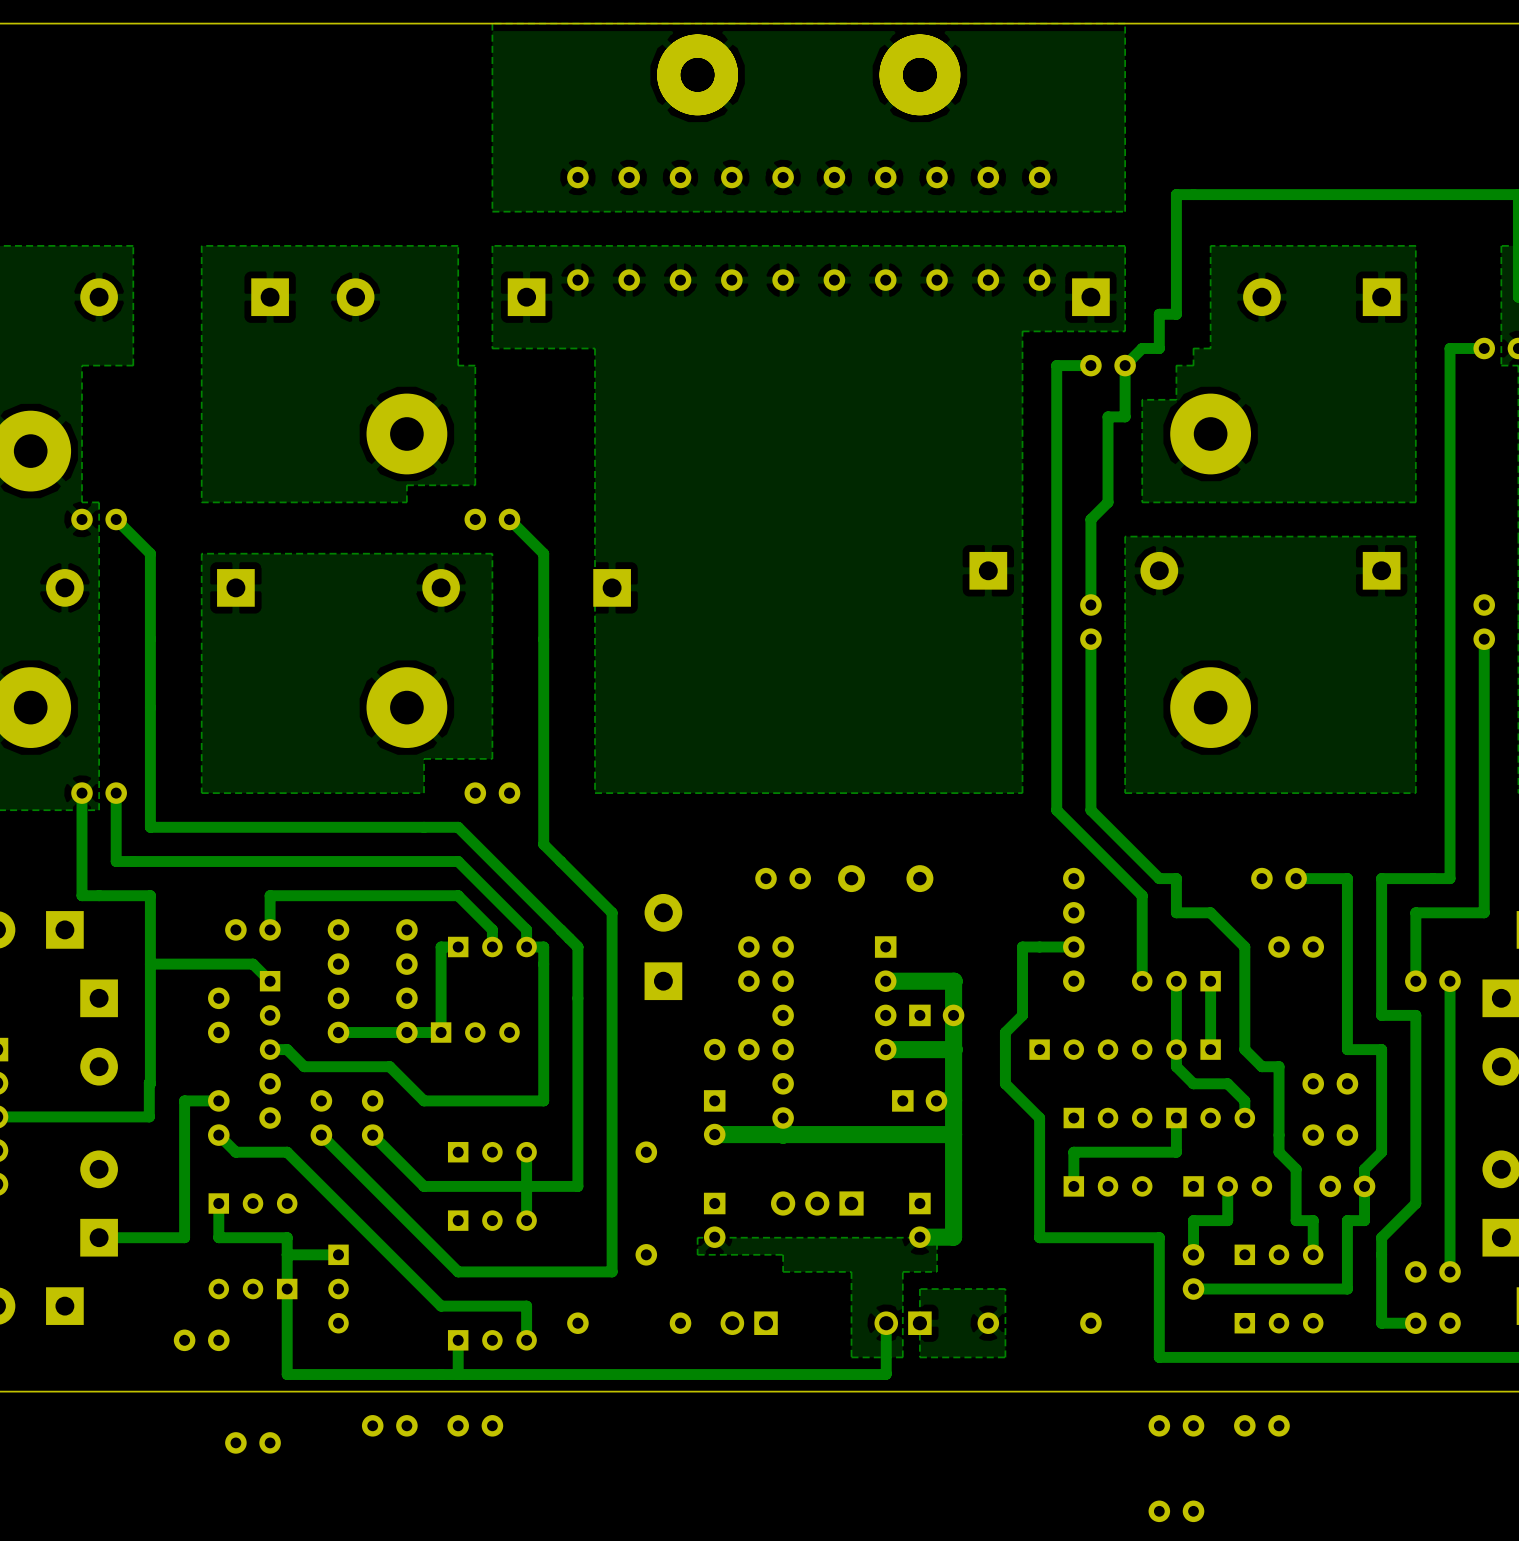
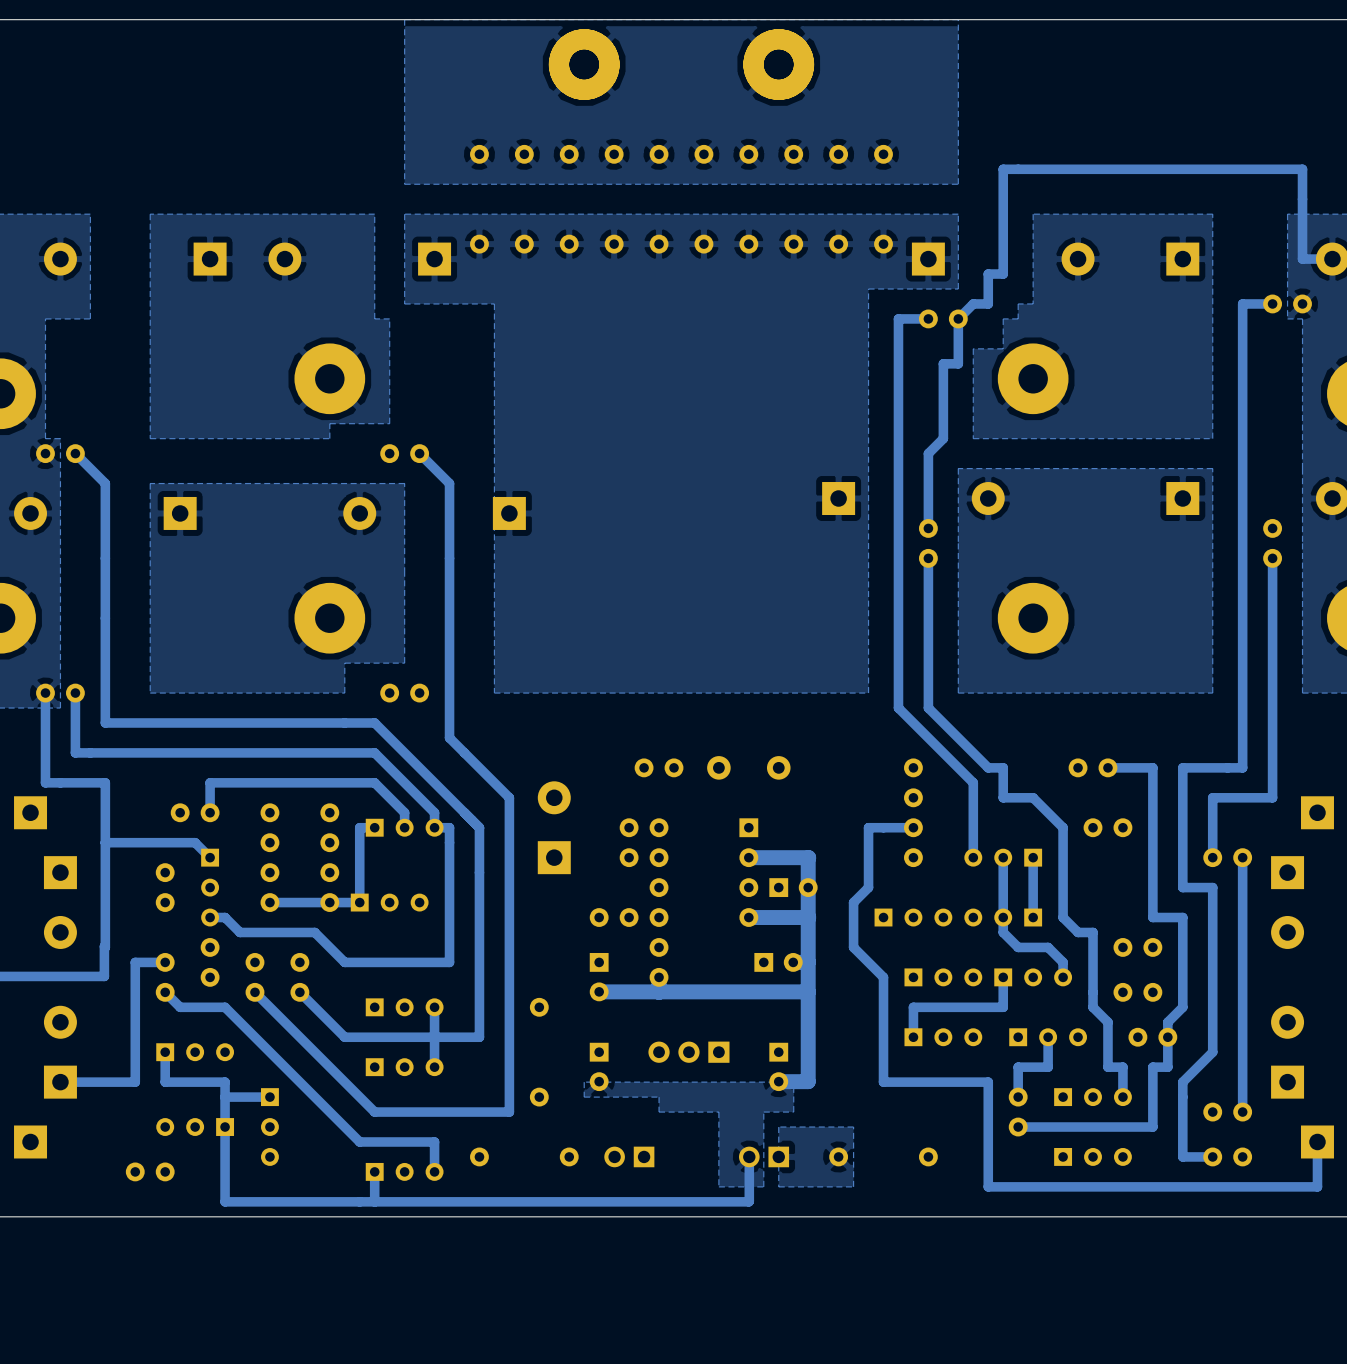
part: (389, 1425) -> none
part: (475, 1425) -> none
part: (1176, 1425) -> none
part: (1261, 1425) -> none
part: (253, 1442) -> none
part: (1176, 1511) -> none

